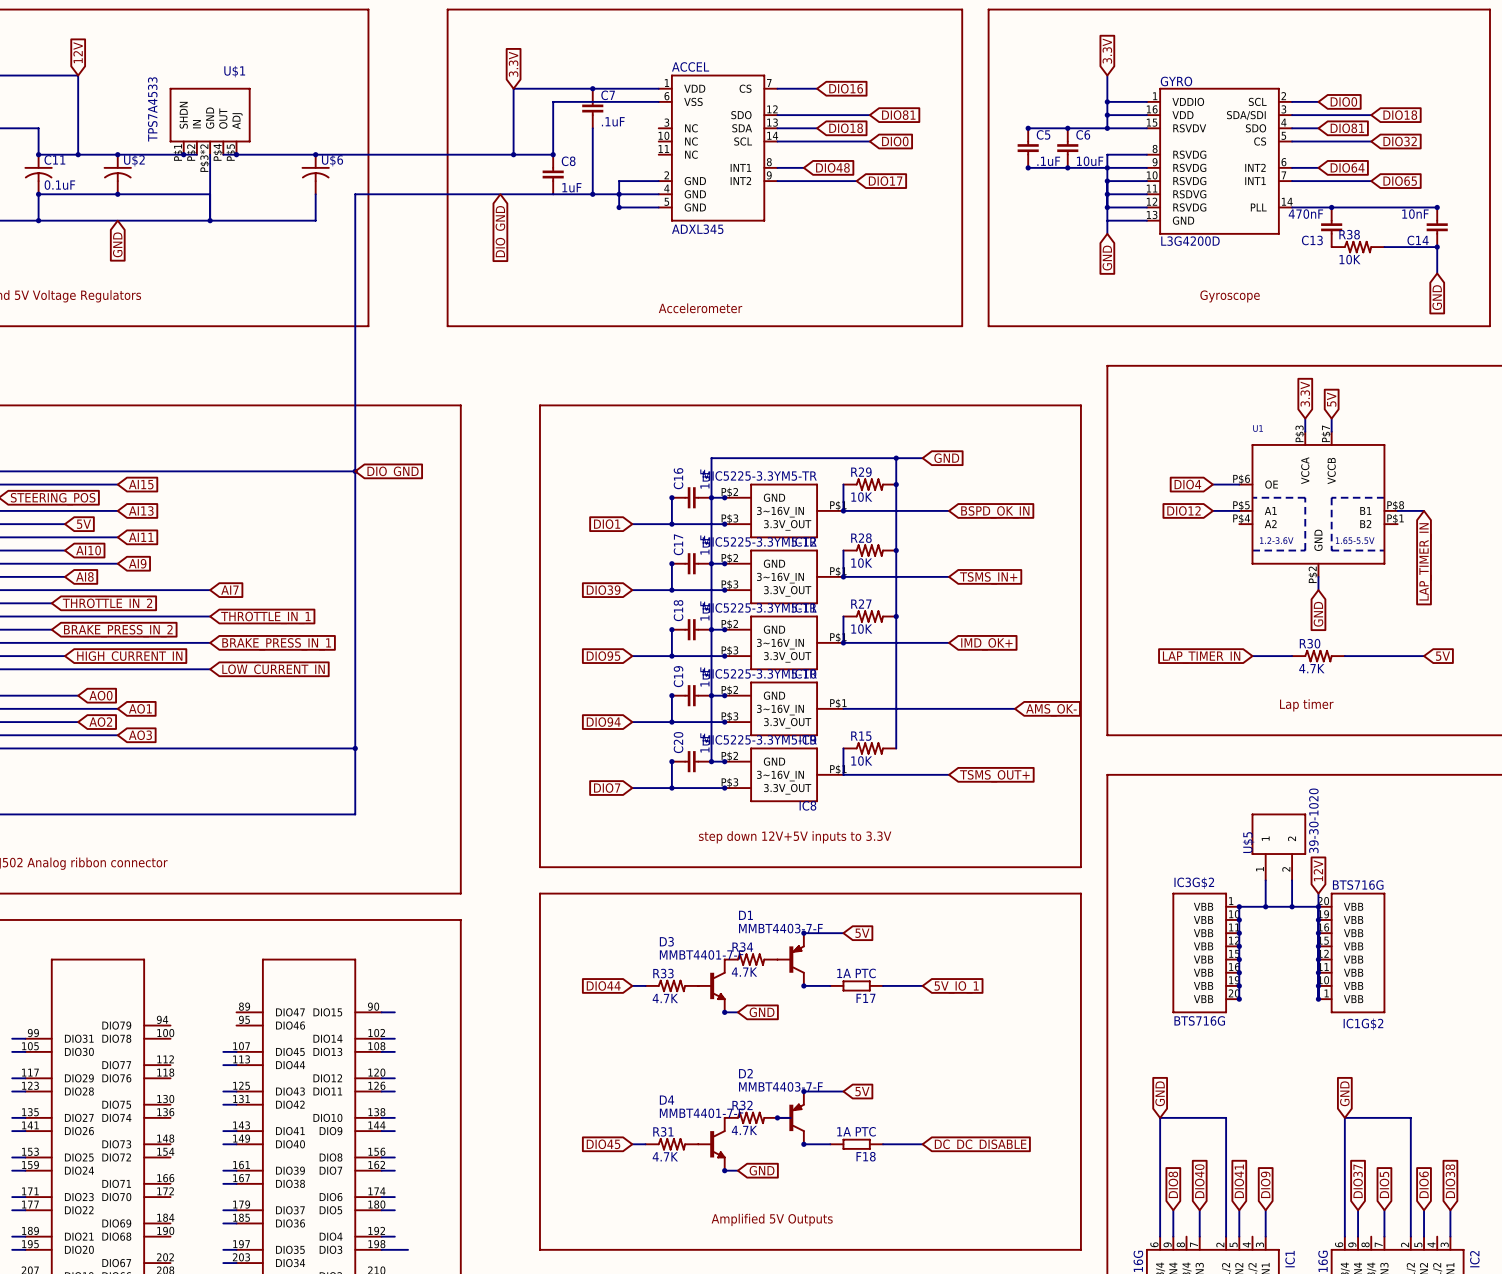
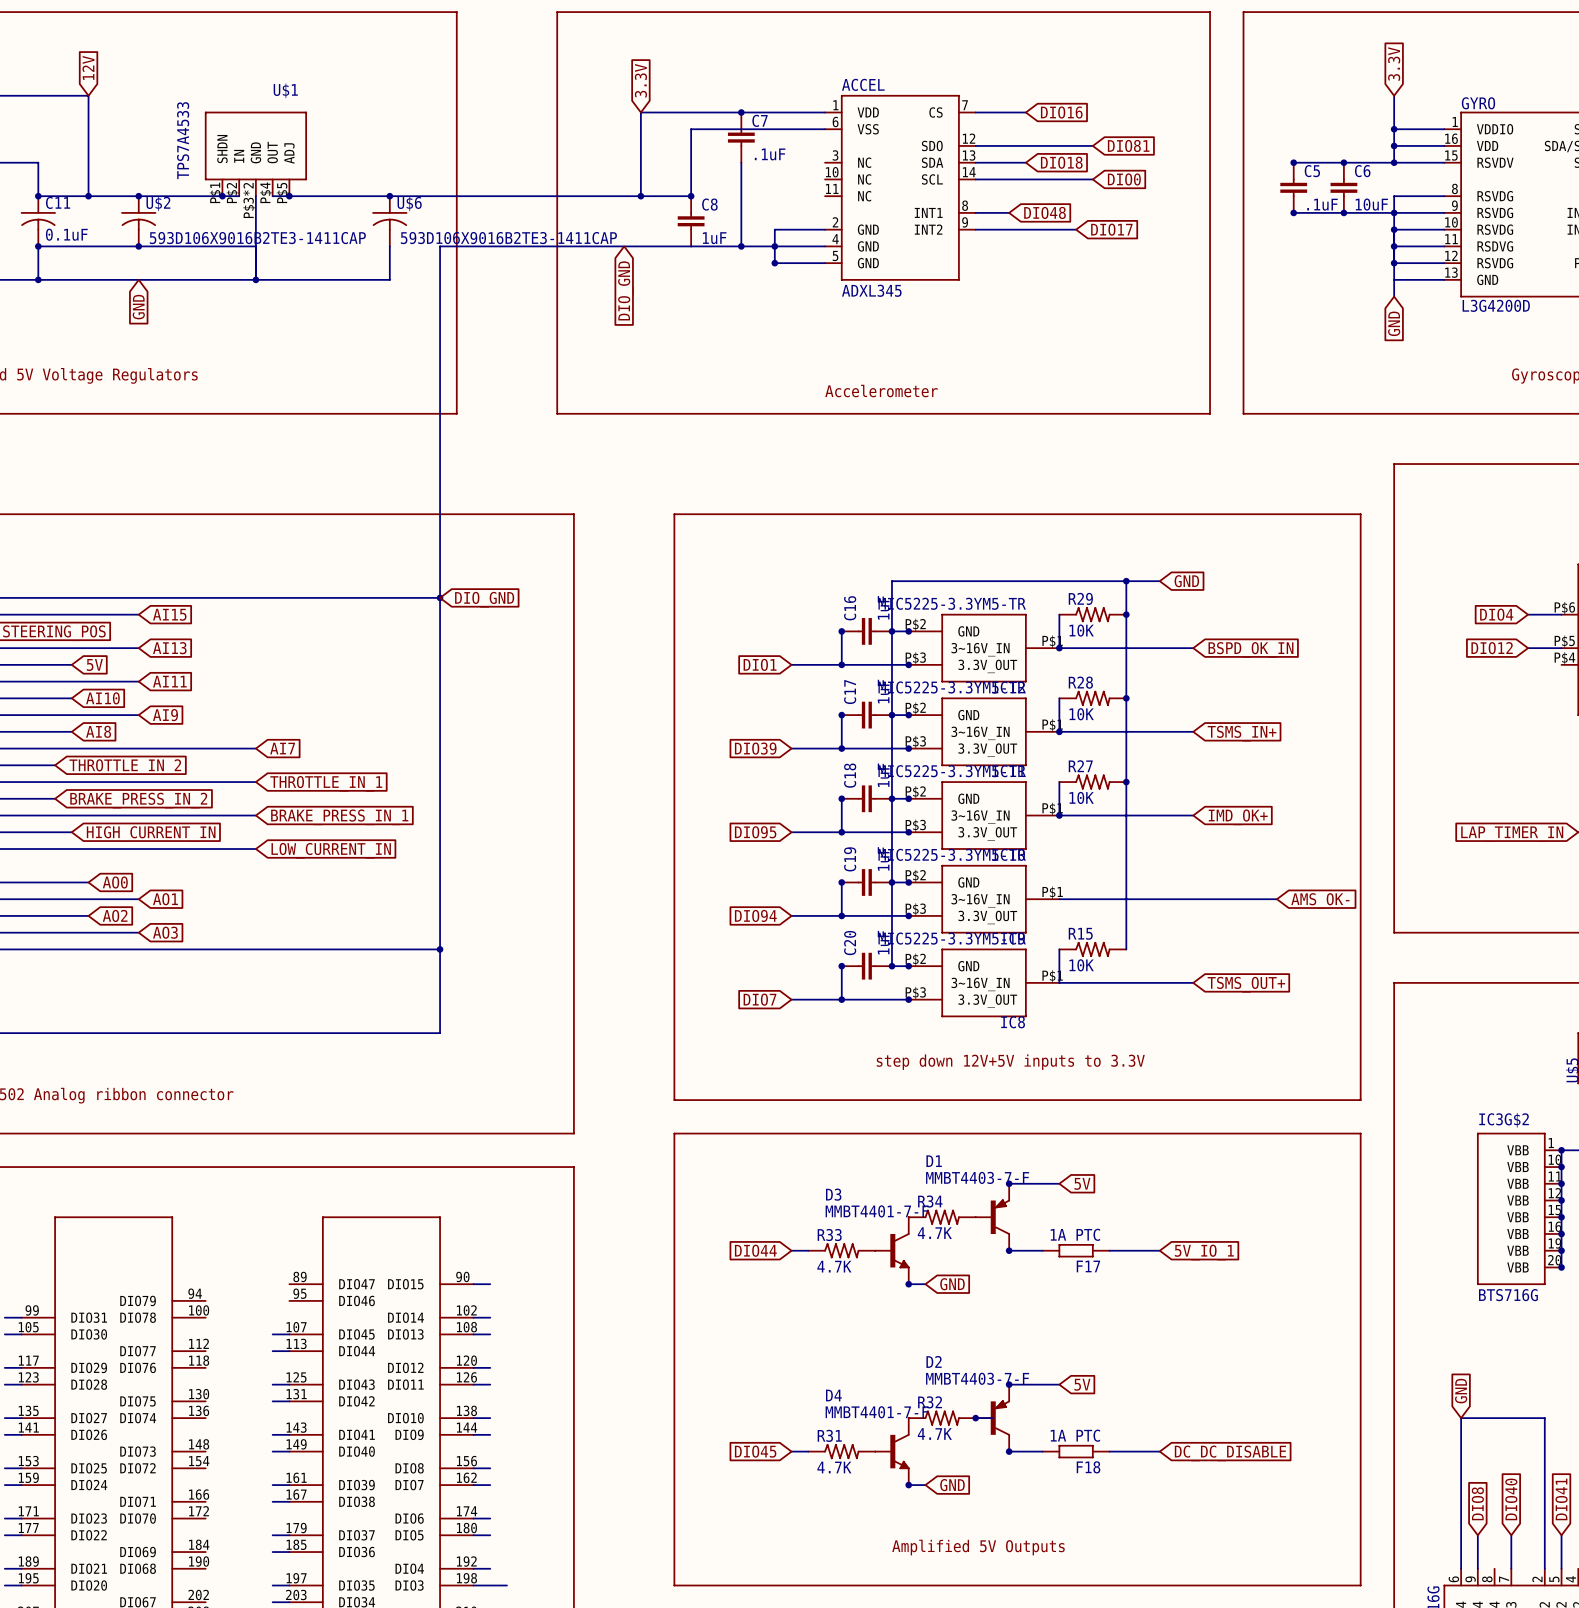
U$2 value: none -> 593D106X9016B2TE3-1411CAP (257, 238)
U$6 value: none -> 593D106X9016B2TE3-1411CAP (508, 238)

